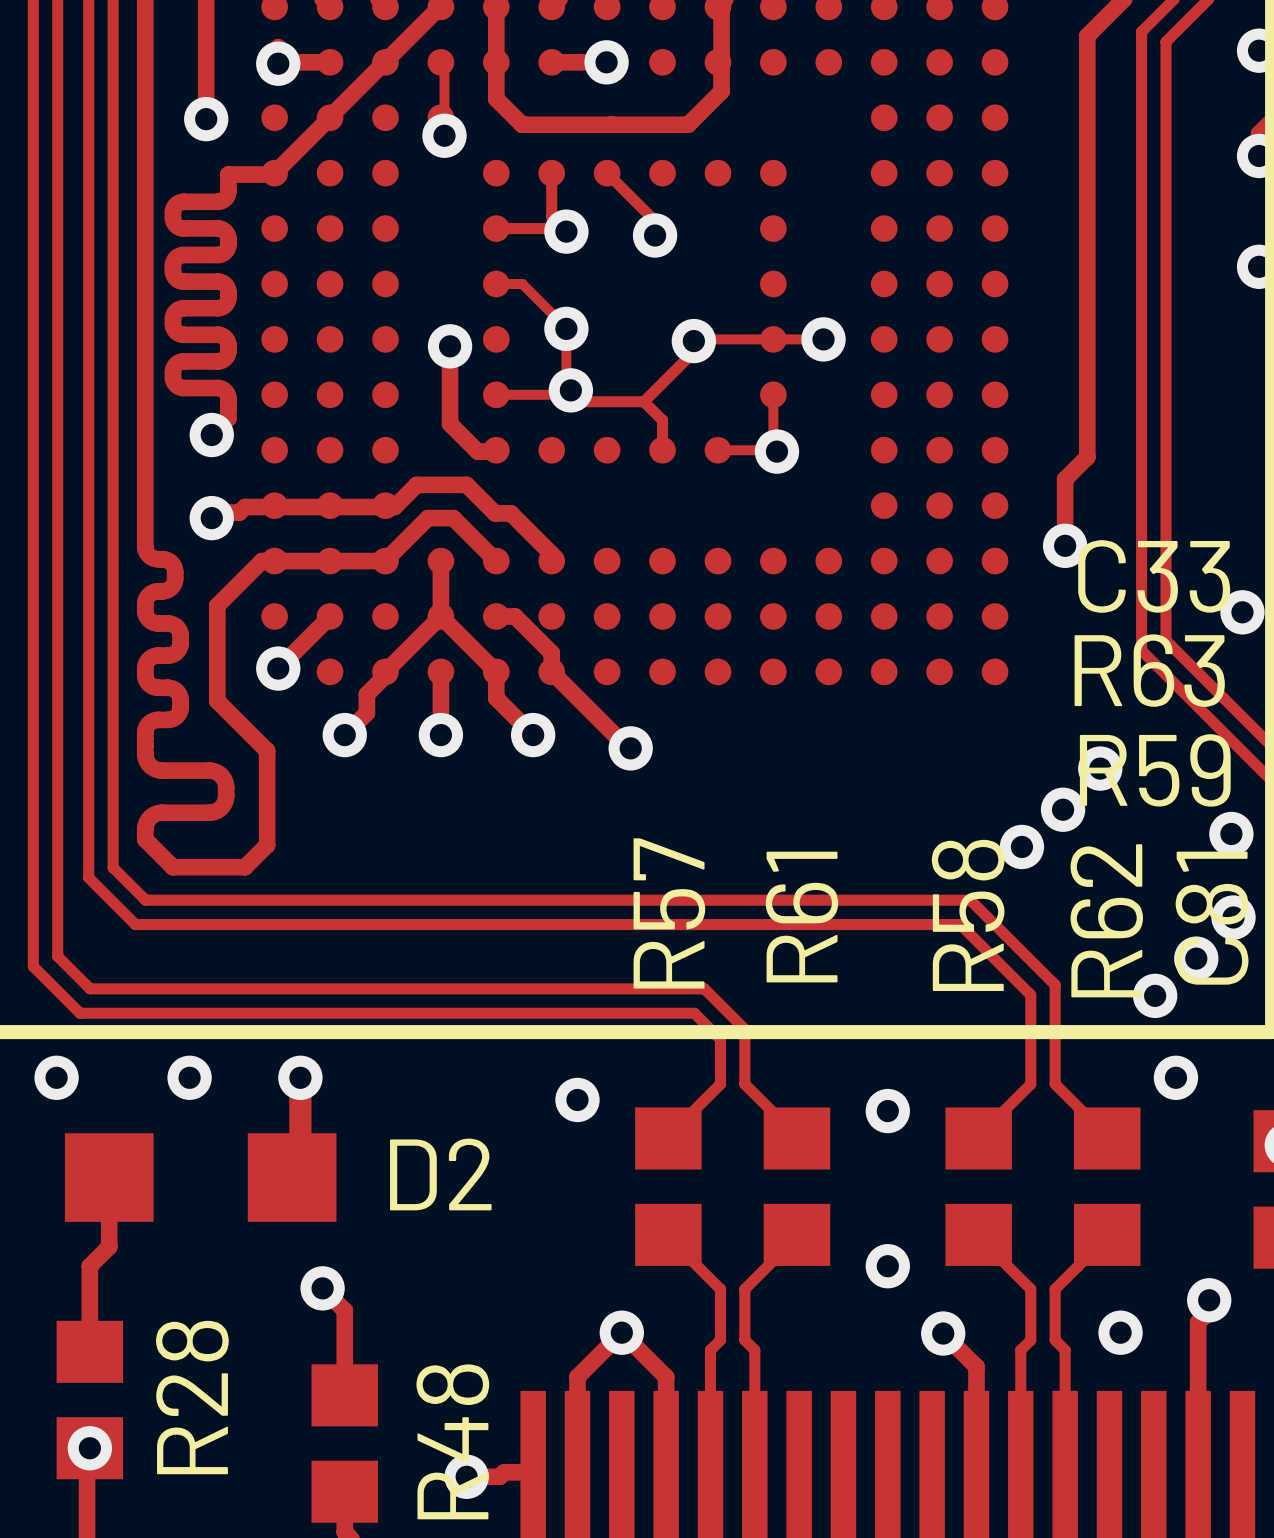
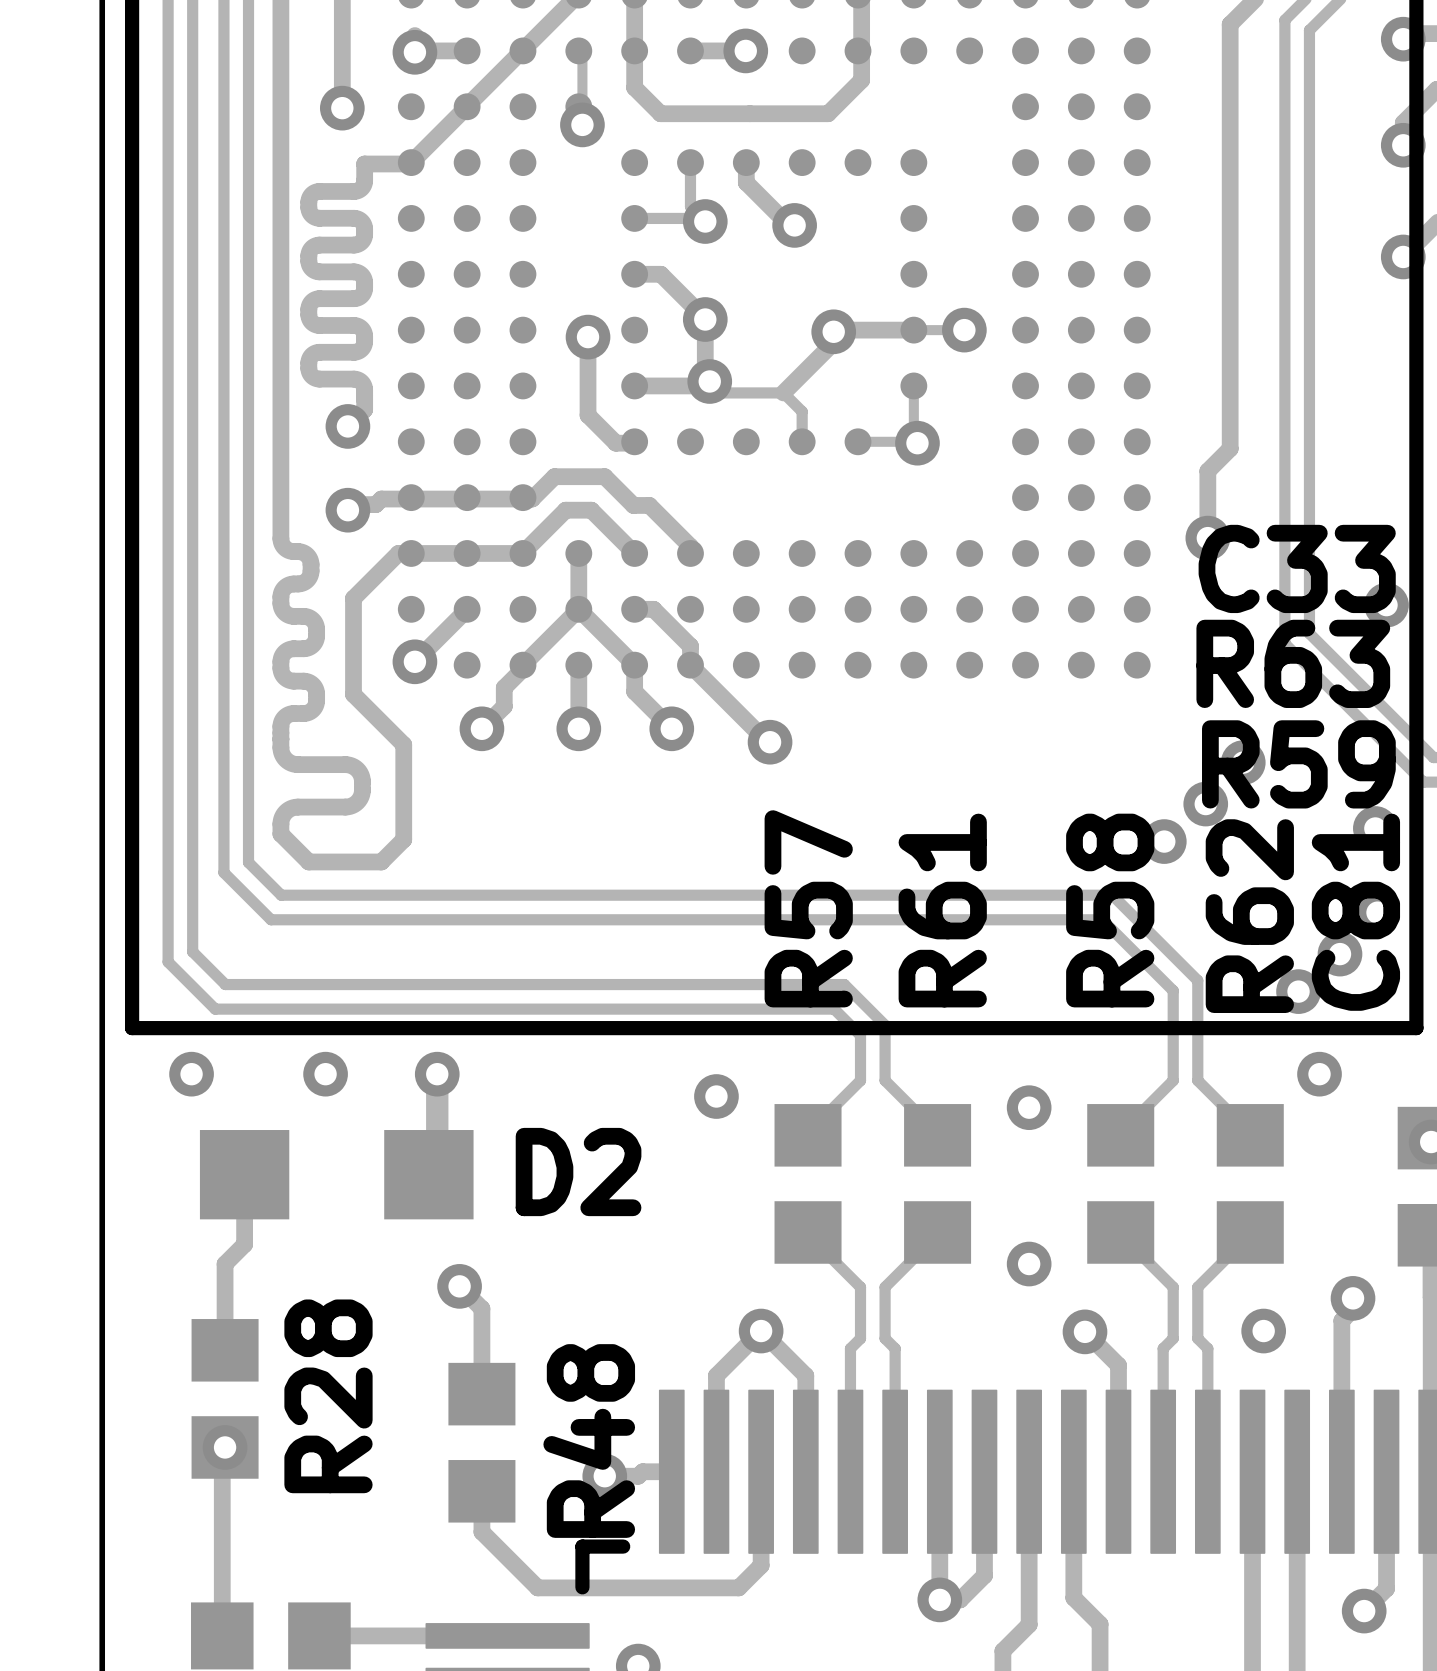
track: (607, 173) (655, 221) (655, 235) -> (746, 162) (746, 182) (789, 225) (794, 225)
track width: thin (496, 283) (522, 283) (566, 328) (566, 385) -> thick (634, 274) (660, 274) (705, 318) (705, 377)
track width: thin (773, 339) (695, 339) (693, 351) (643, 401) -> thick (913, 330) (835, 330) (833, 342) (783, 392)
track width: thin (570, 390) (566, 394) (496, 394) -> thick (709, 381) (705, 385) (634, 385)

